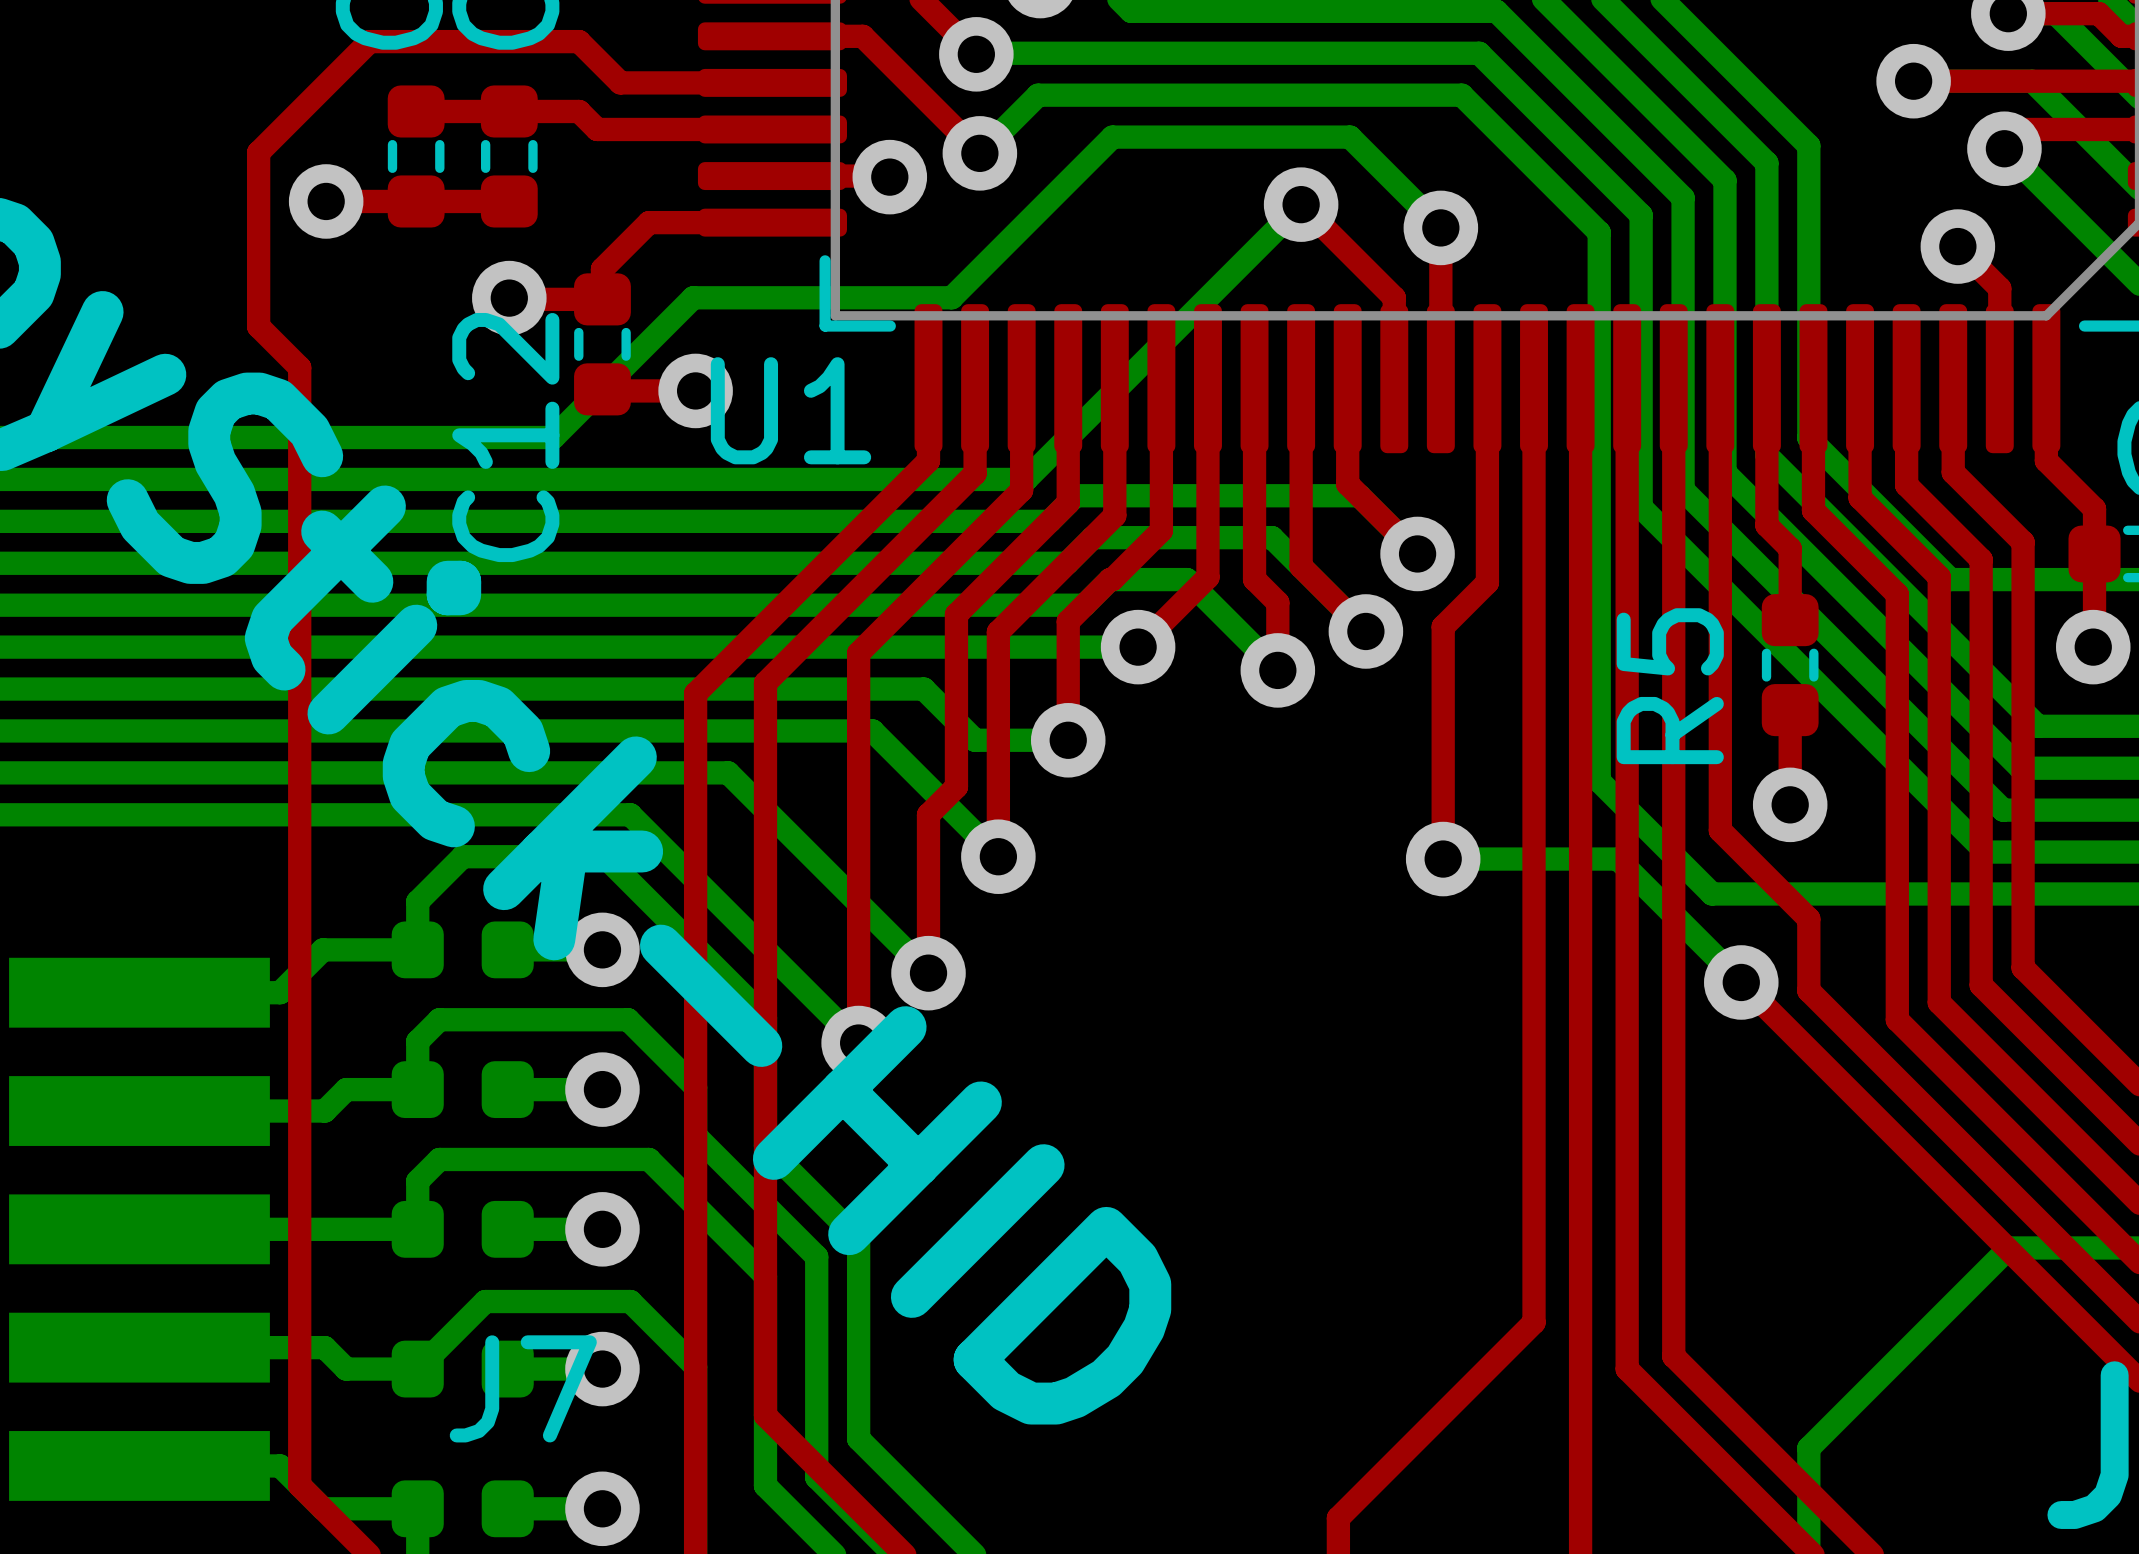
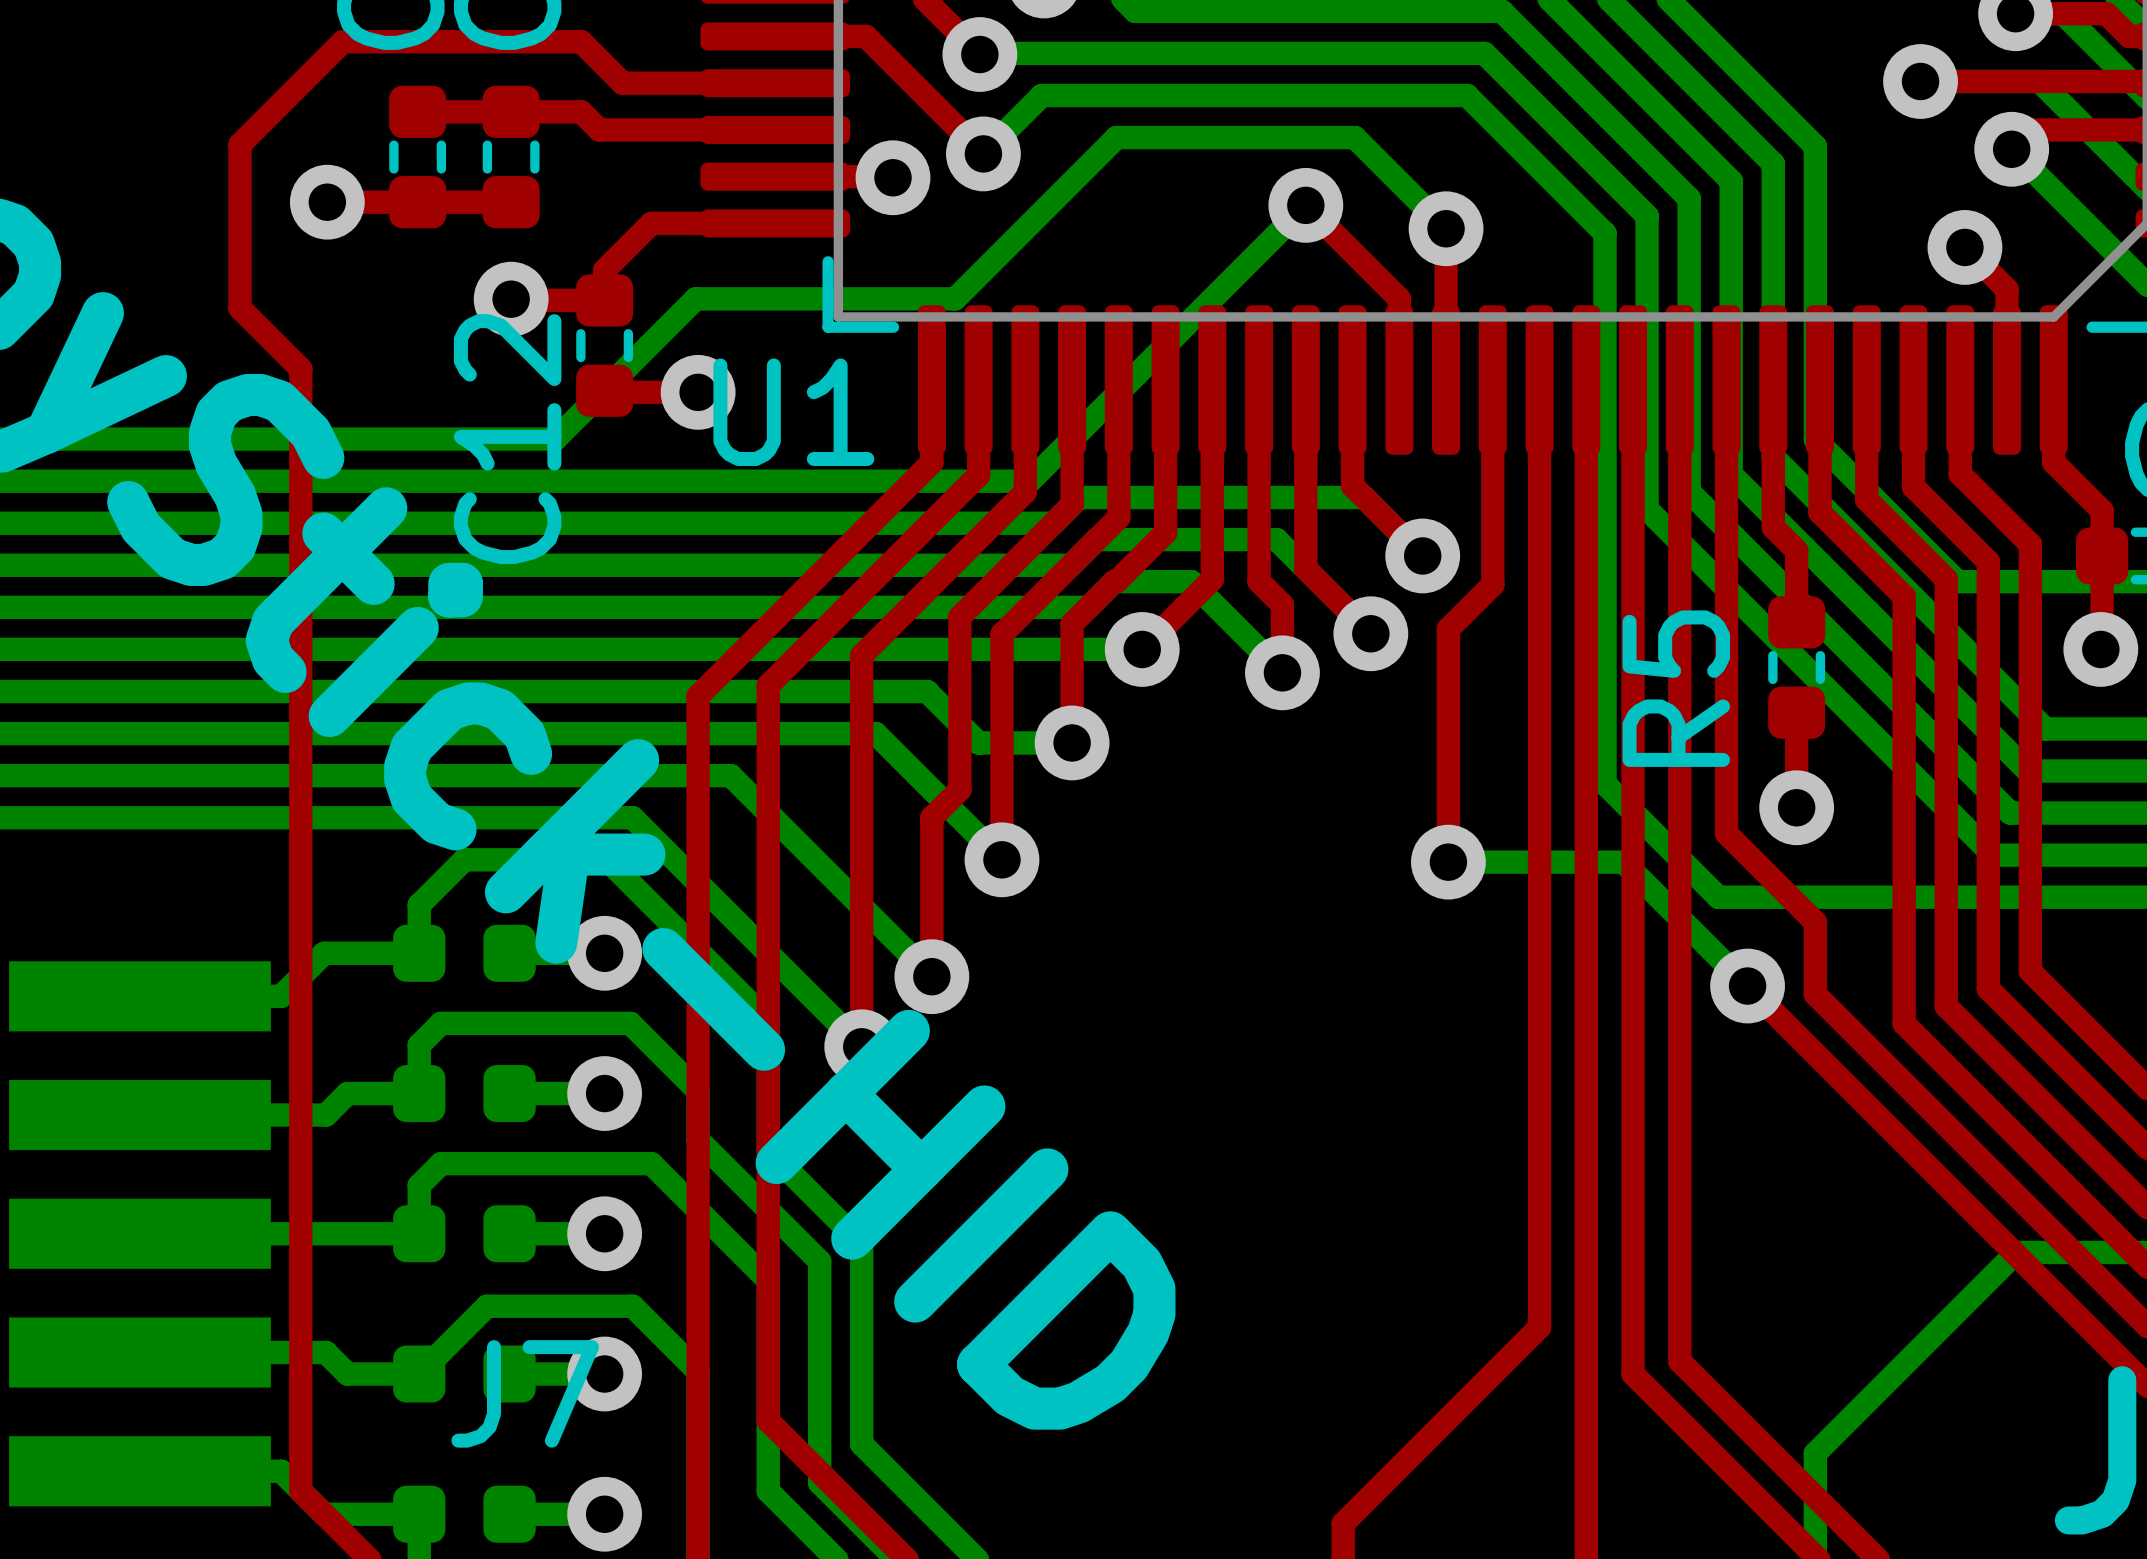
top track: (369, 41) (258, 152) (258, 326) -> (370, 41) (342, 41) (240, 144) (240, 308) (259, 327)

